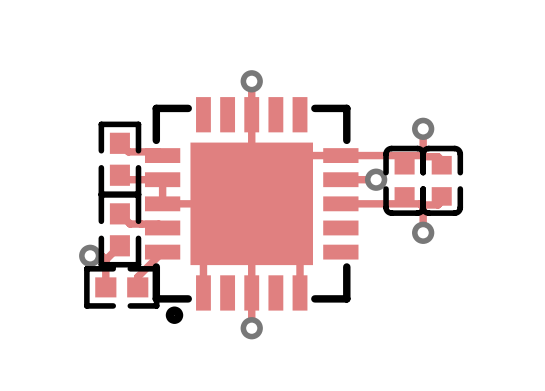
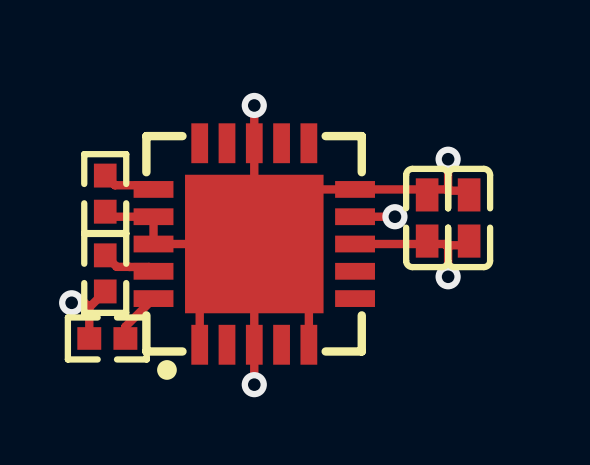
part footprint: [383, 145, 426, 216] -> [402, 165, 452, 271]
part footprint: [420, 145, 464, 216] -> [444, 165, 494, 271]

